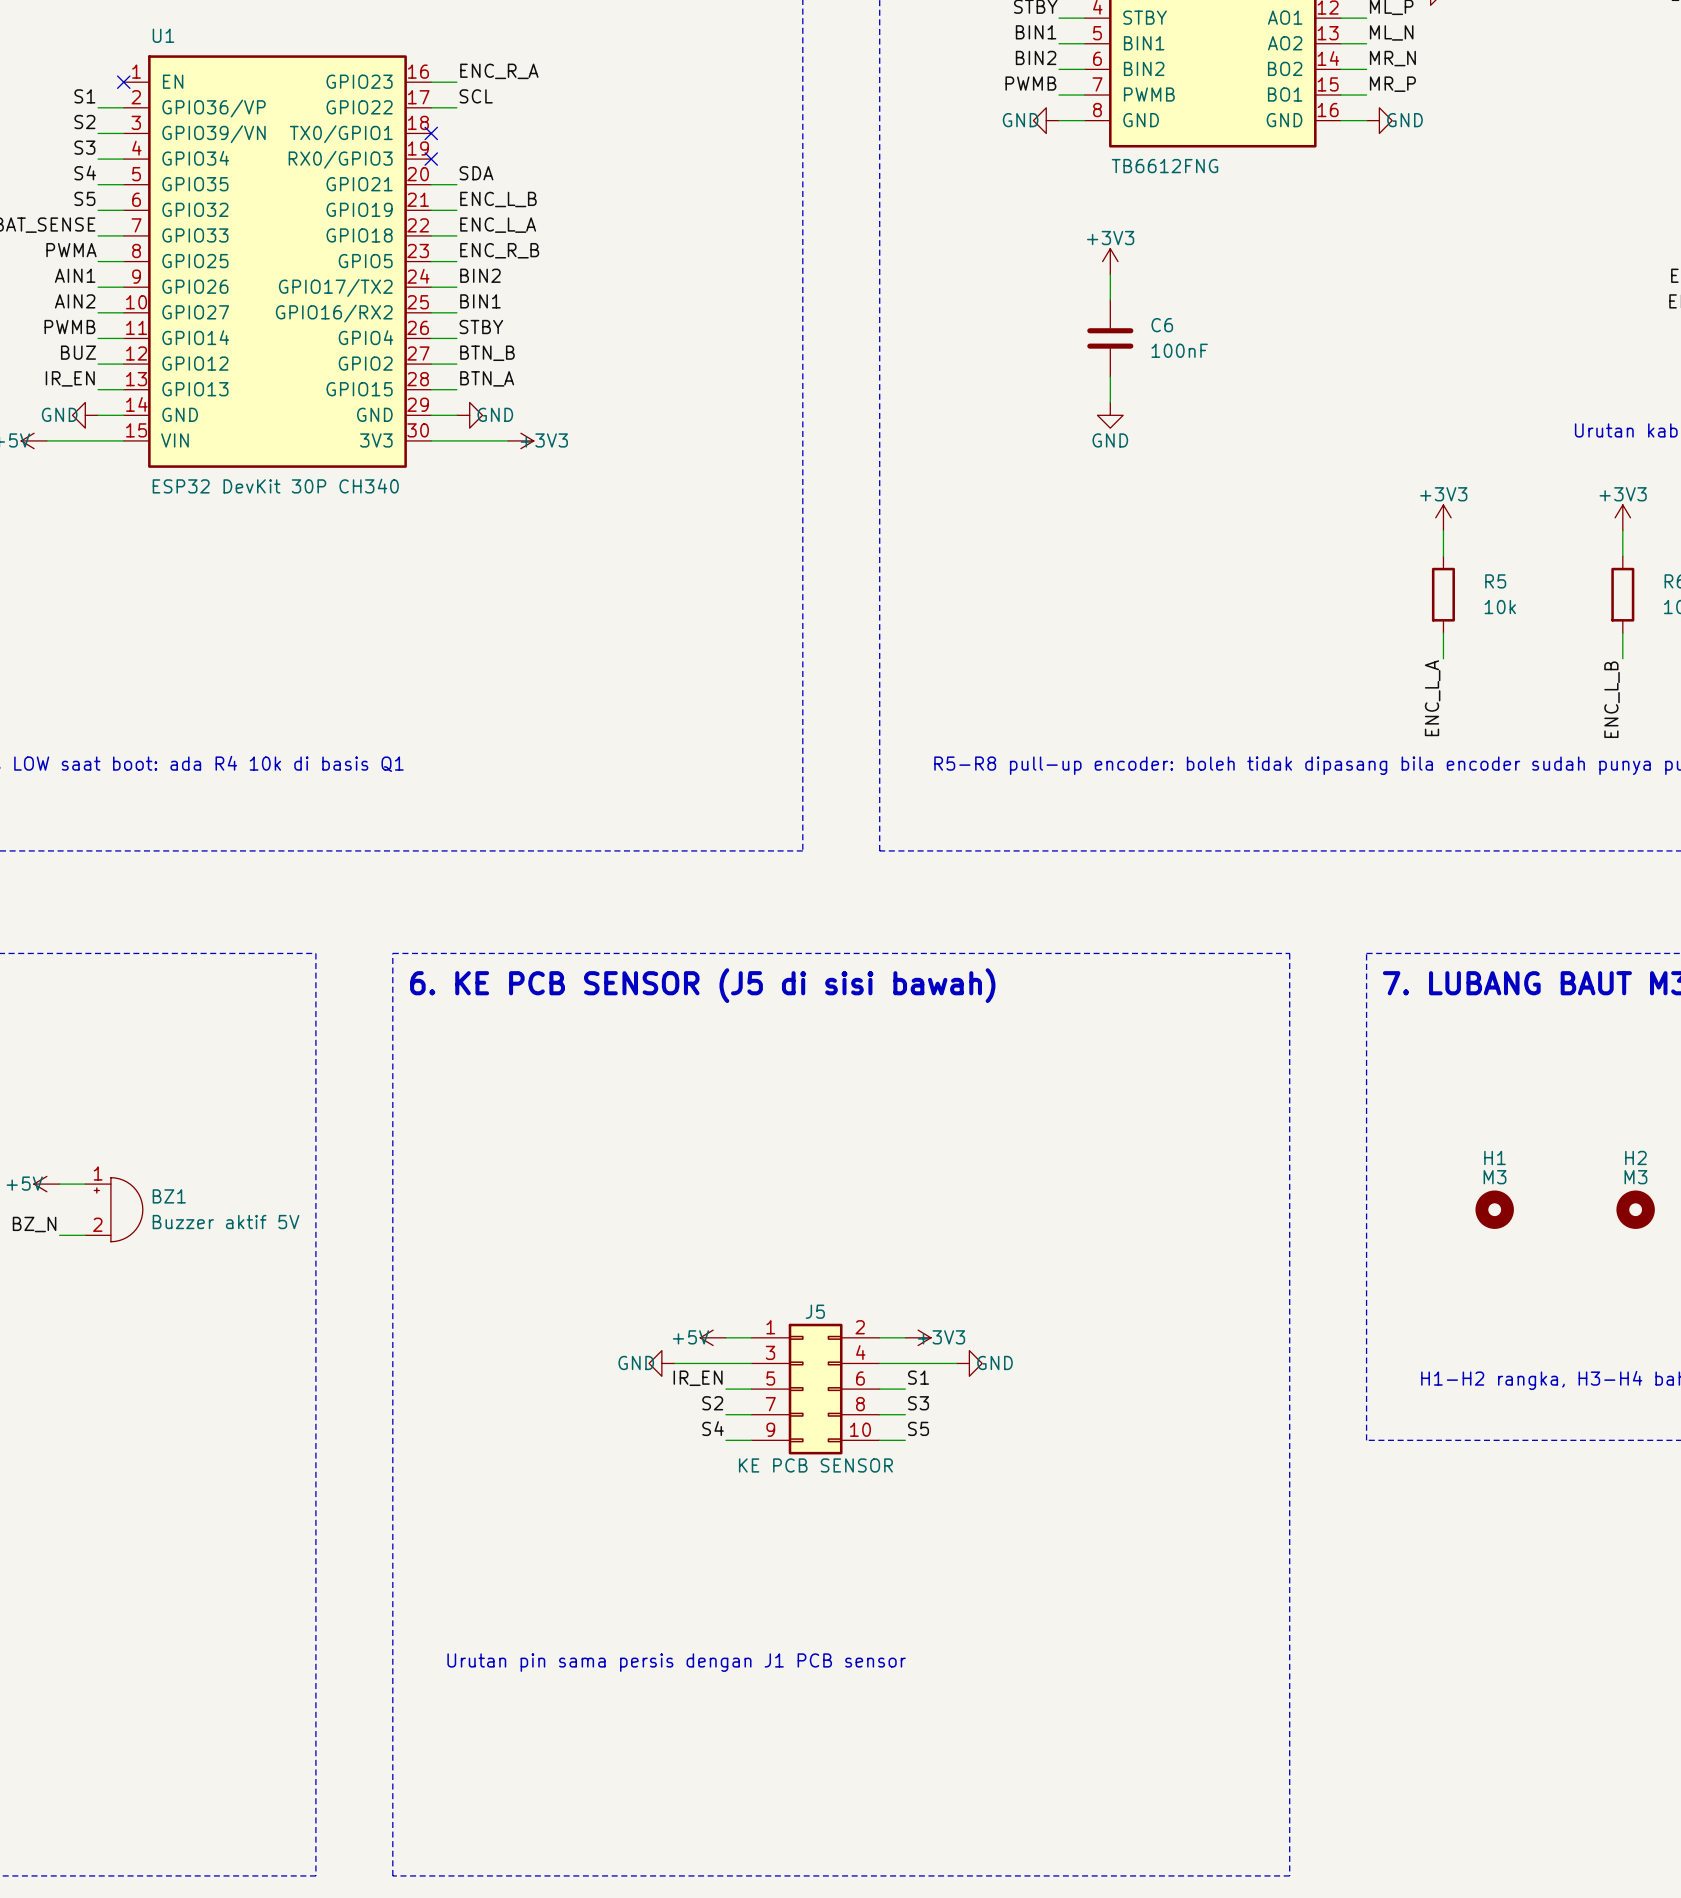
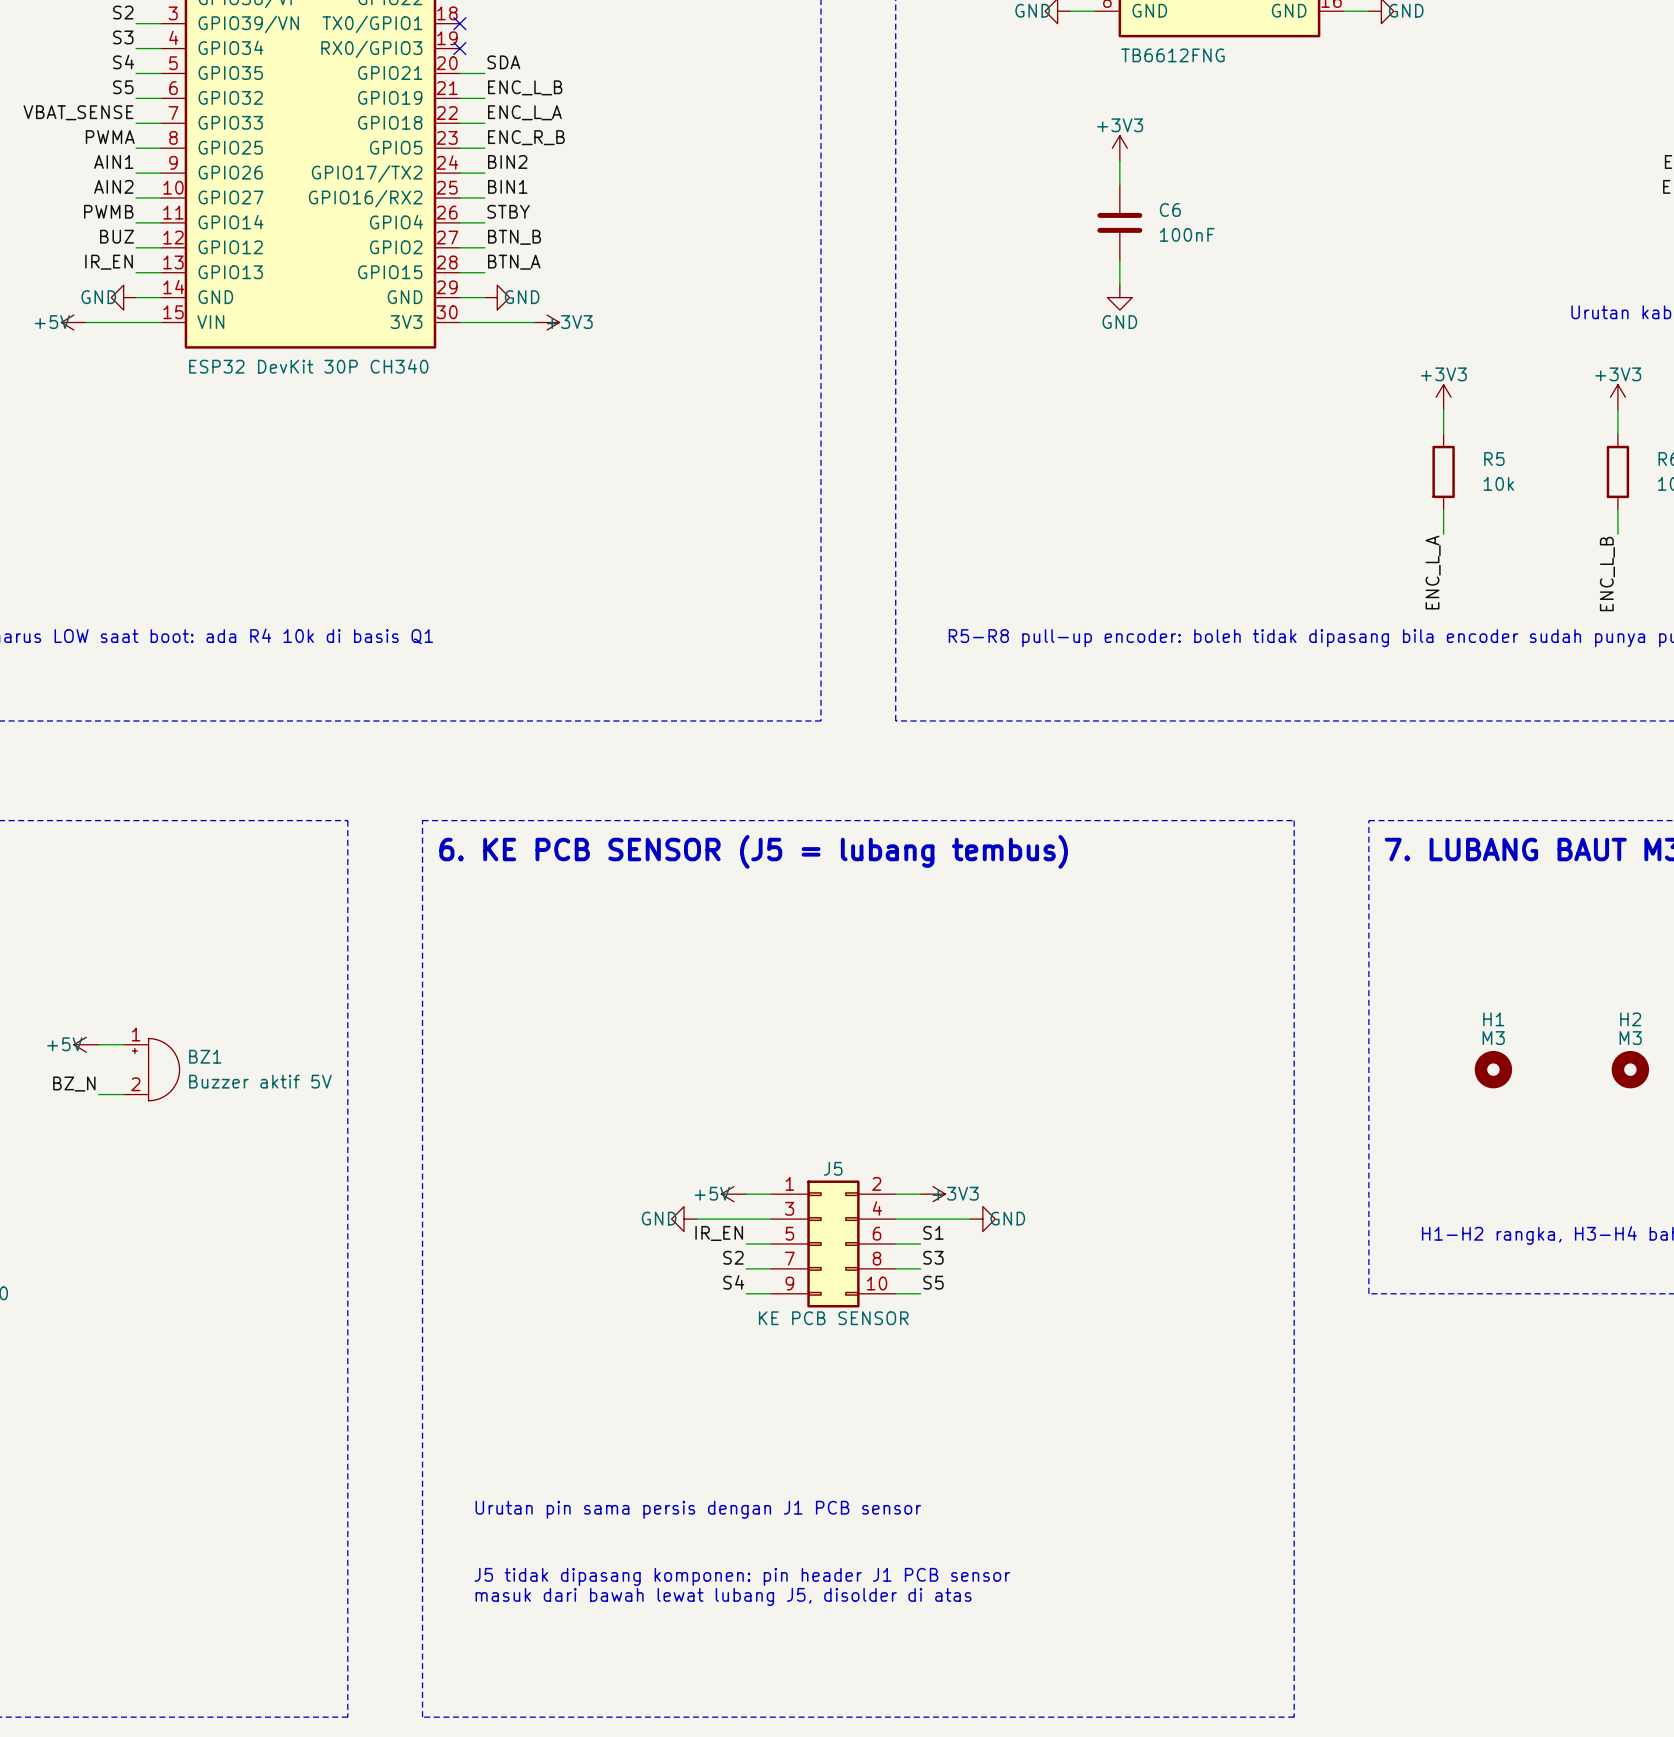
text: 6. KE PCB SENSOR (J5 di sisi bawah) (702, 985) -> 6. KE PCB SENSOR (J5 = lubang tembus) (753, 851)
text: none -> J5 tidak dipasang komponen: pin header J1 PCB sensor (742, 1576)
text: none -> masuk dari bawah lewat lubang J5, disolder di atas (723, 1596)

